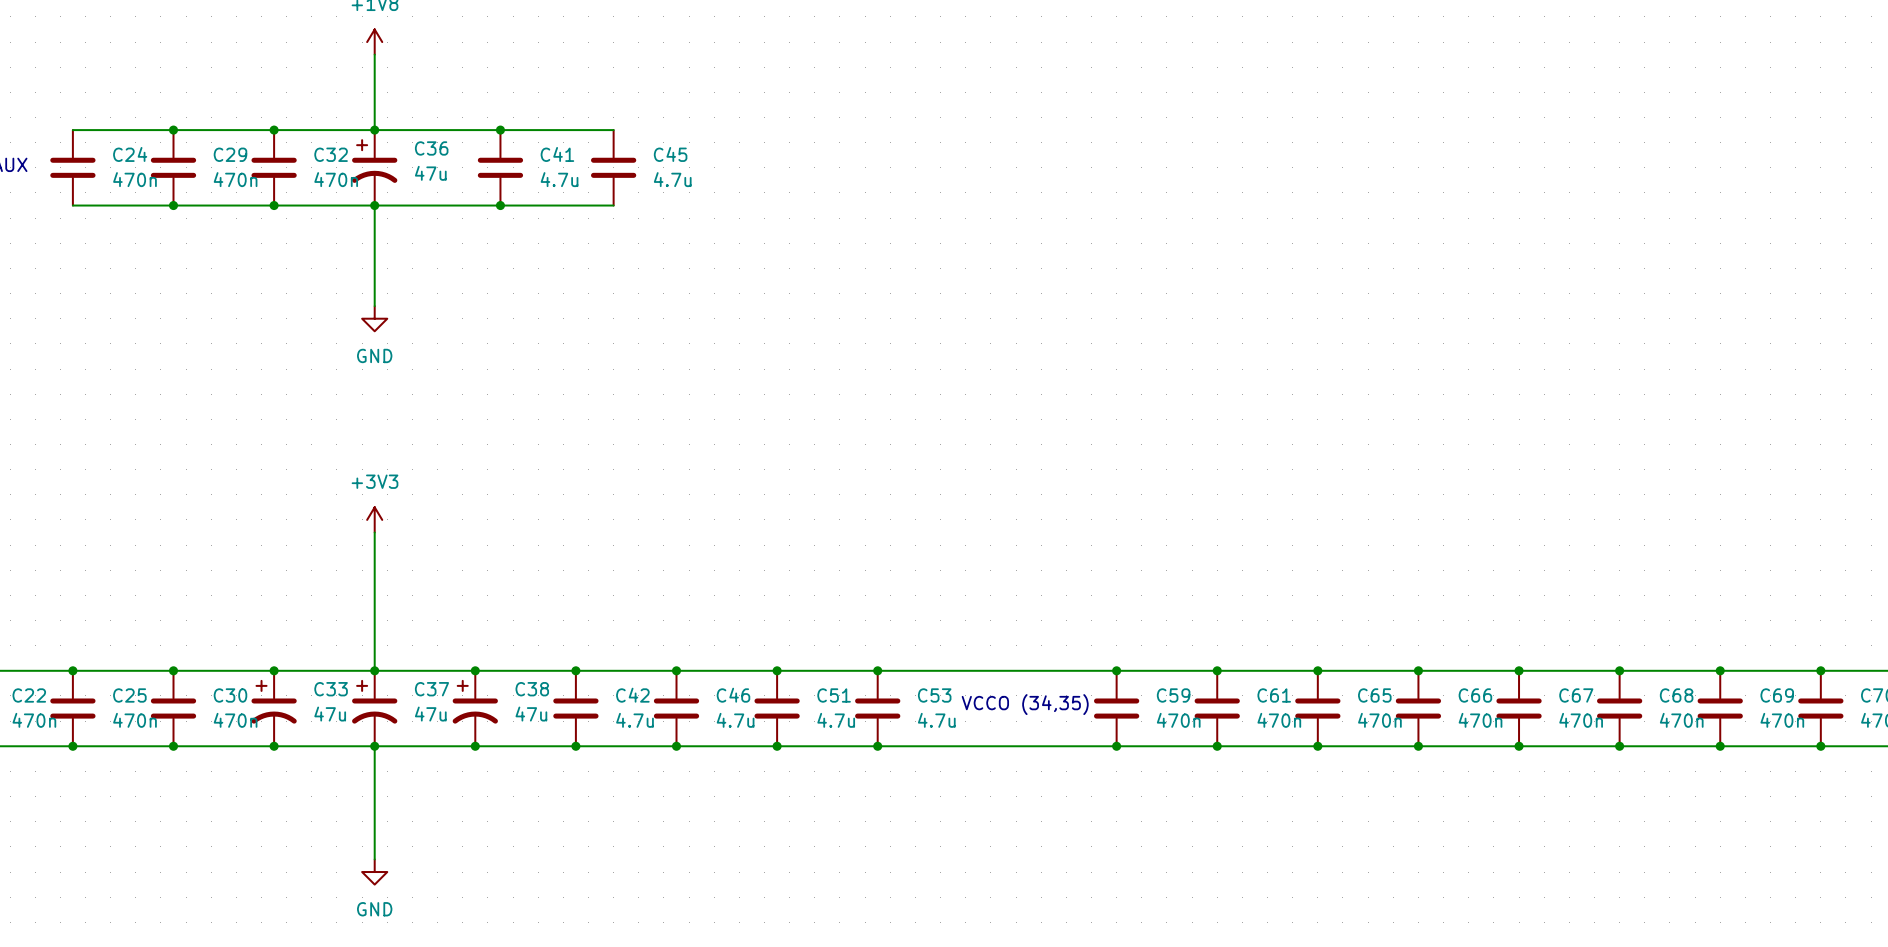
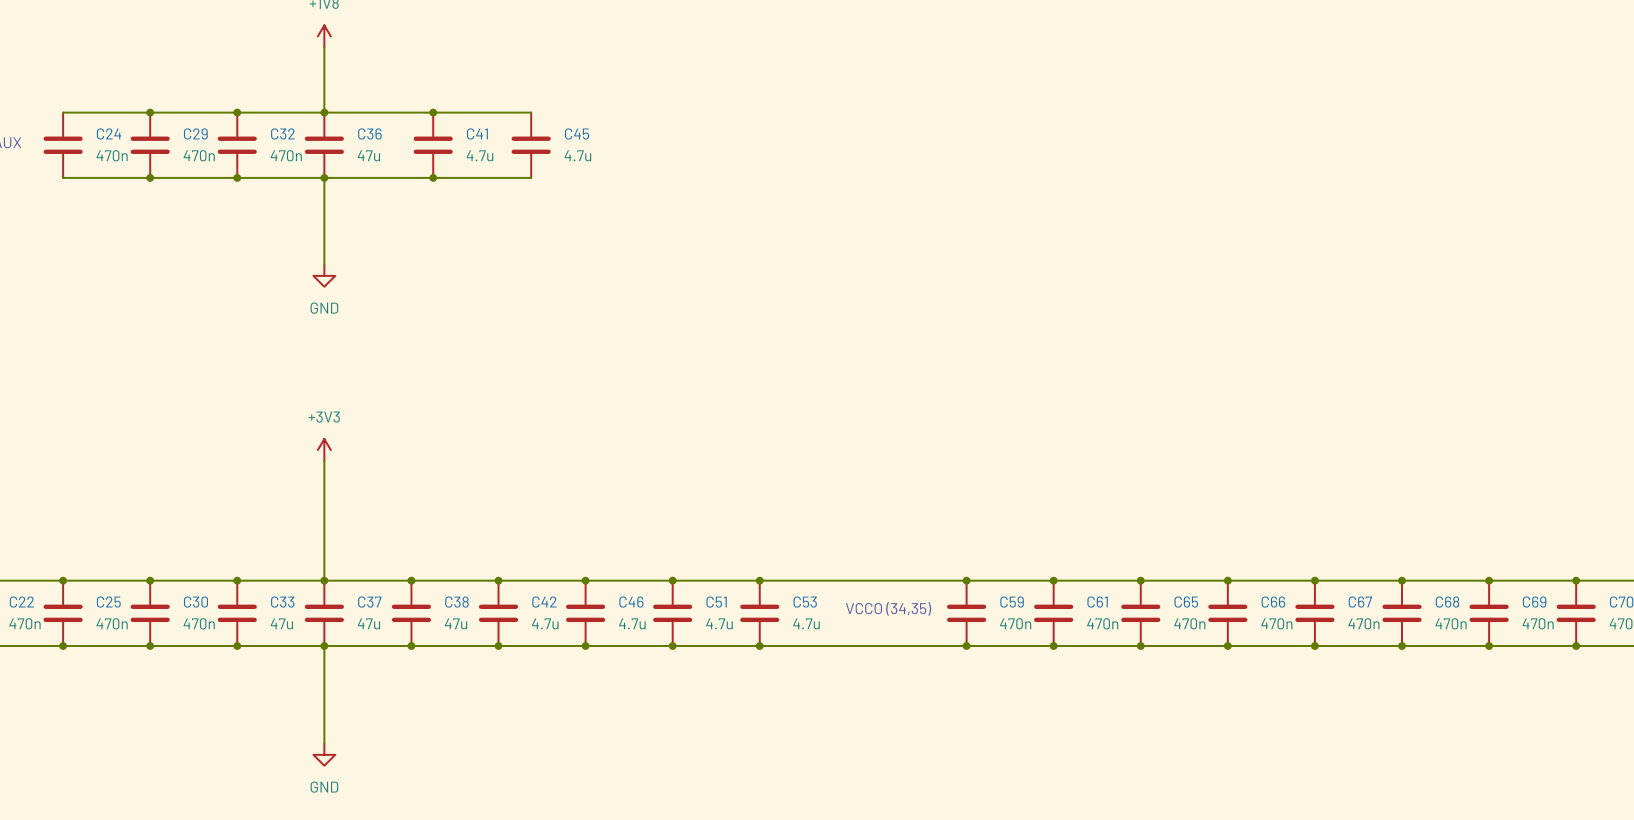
C36 symbol: [352, 130, 398, 206] -> [304, 112, 344, 178]
C33 symbol: [251, 670, 297, 747] -> [217, 580, 257, 646]
C37 symbol: [352, 670, 398, 747] -> [304, 580, 344, 646]
C38 symbol: [452, 670, 498, 747] -> [391, 580, 432, 646]

